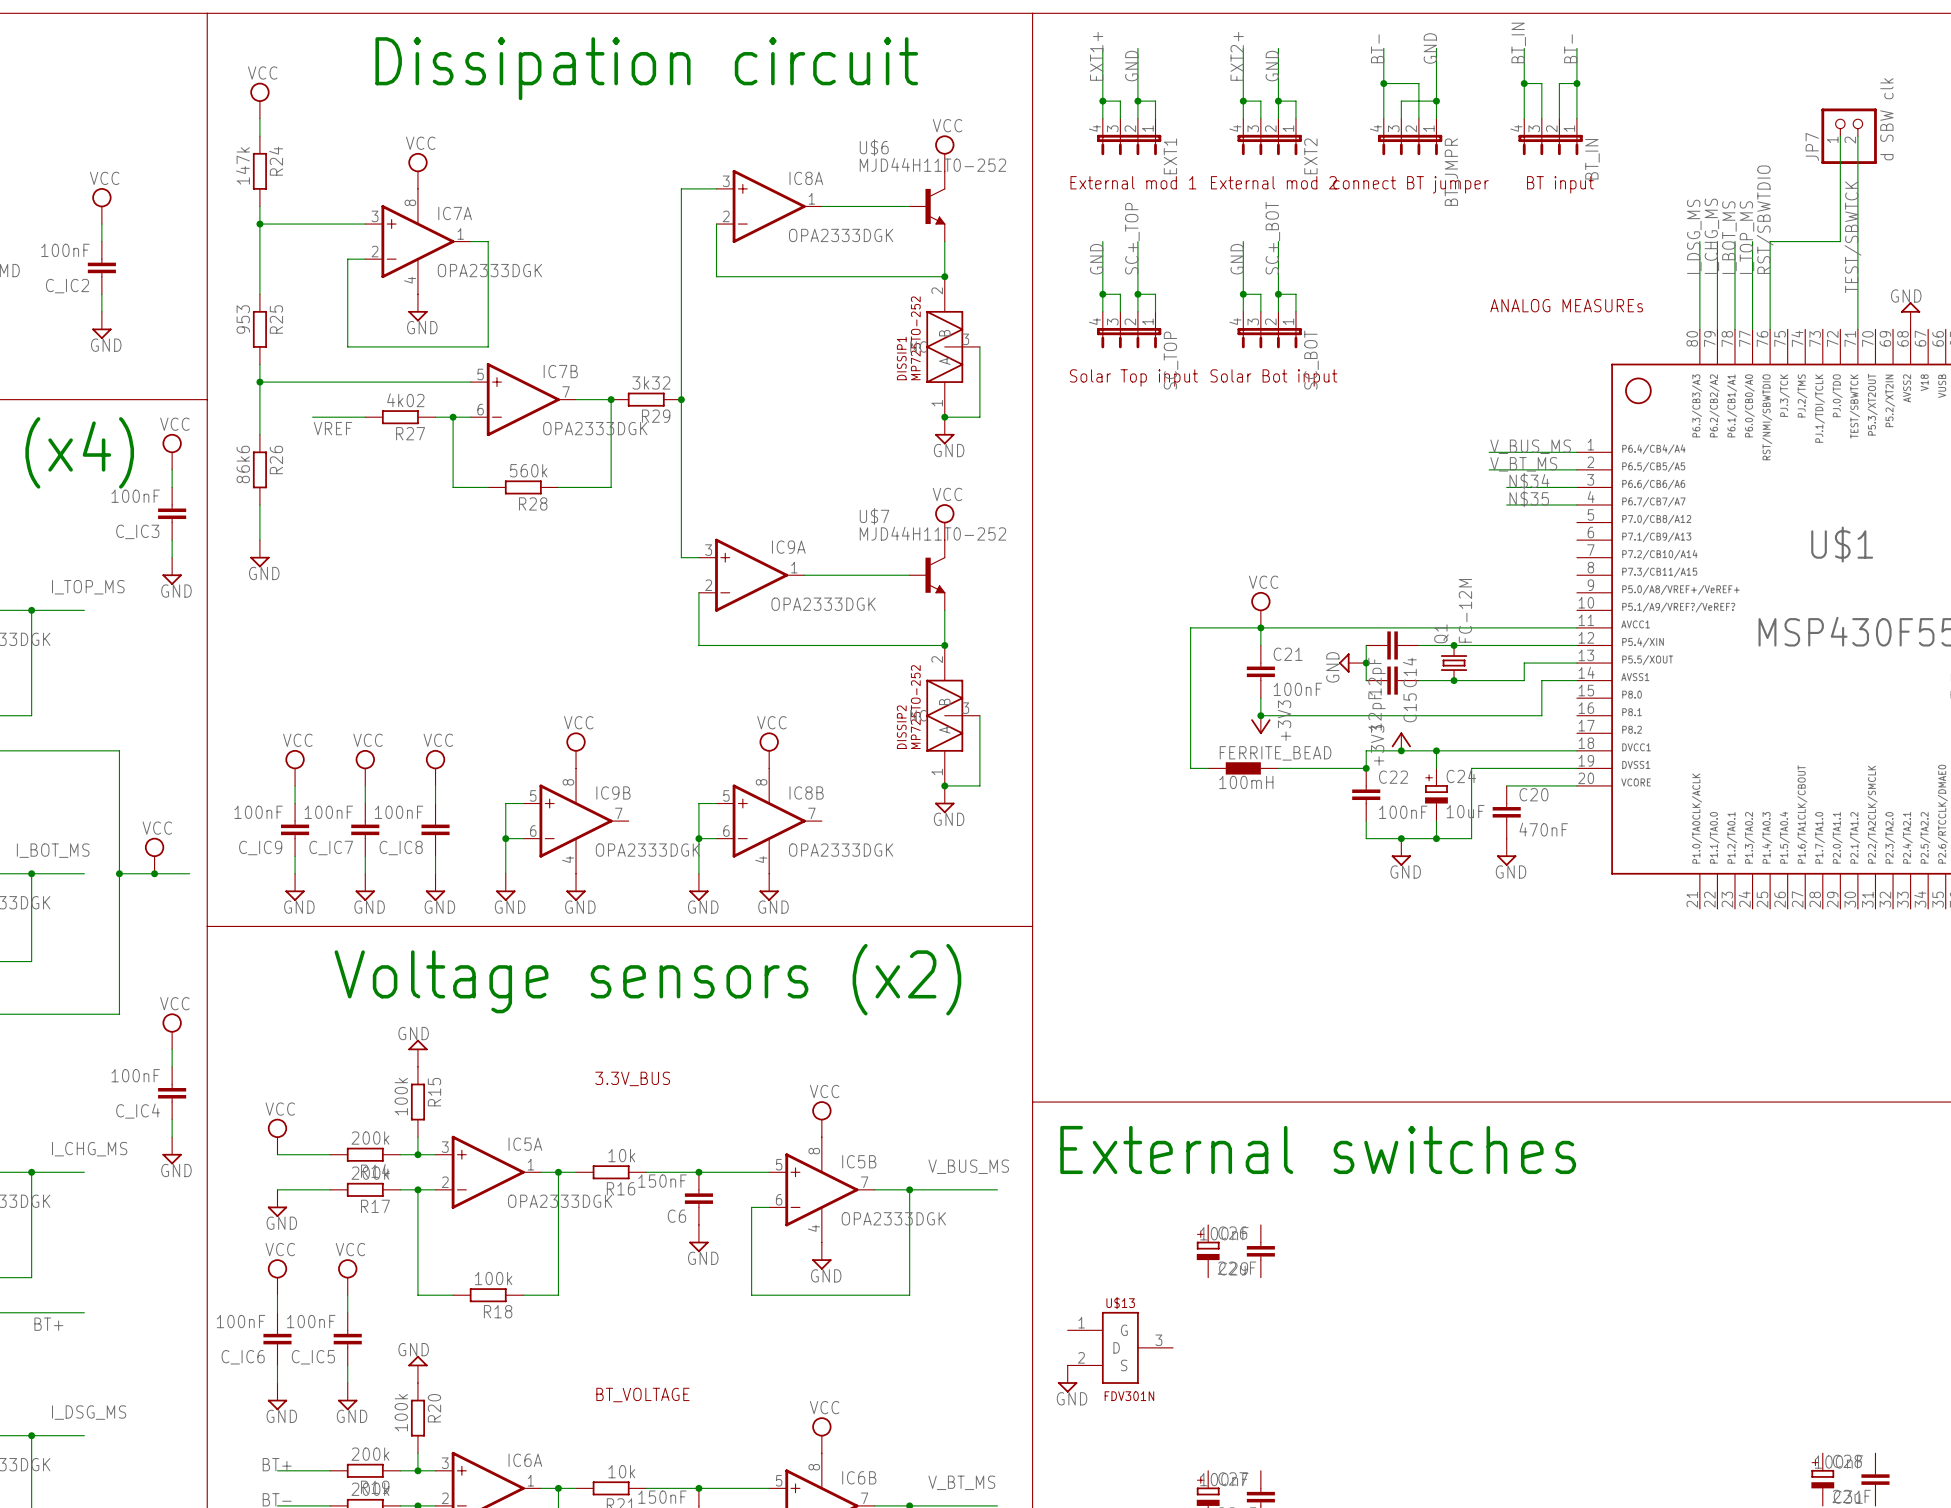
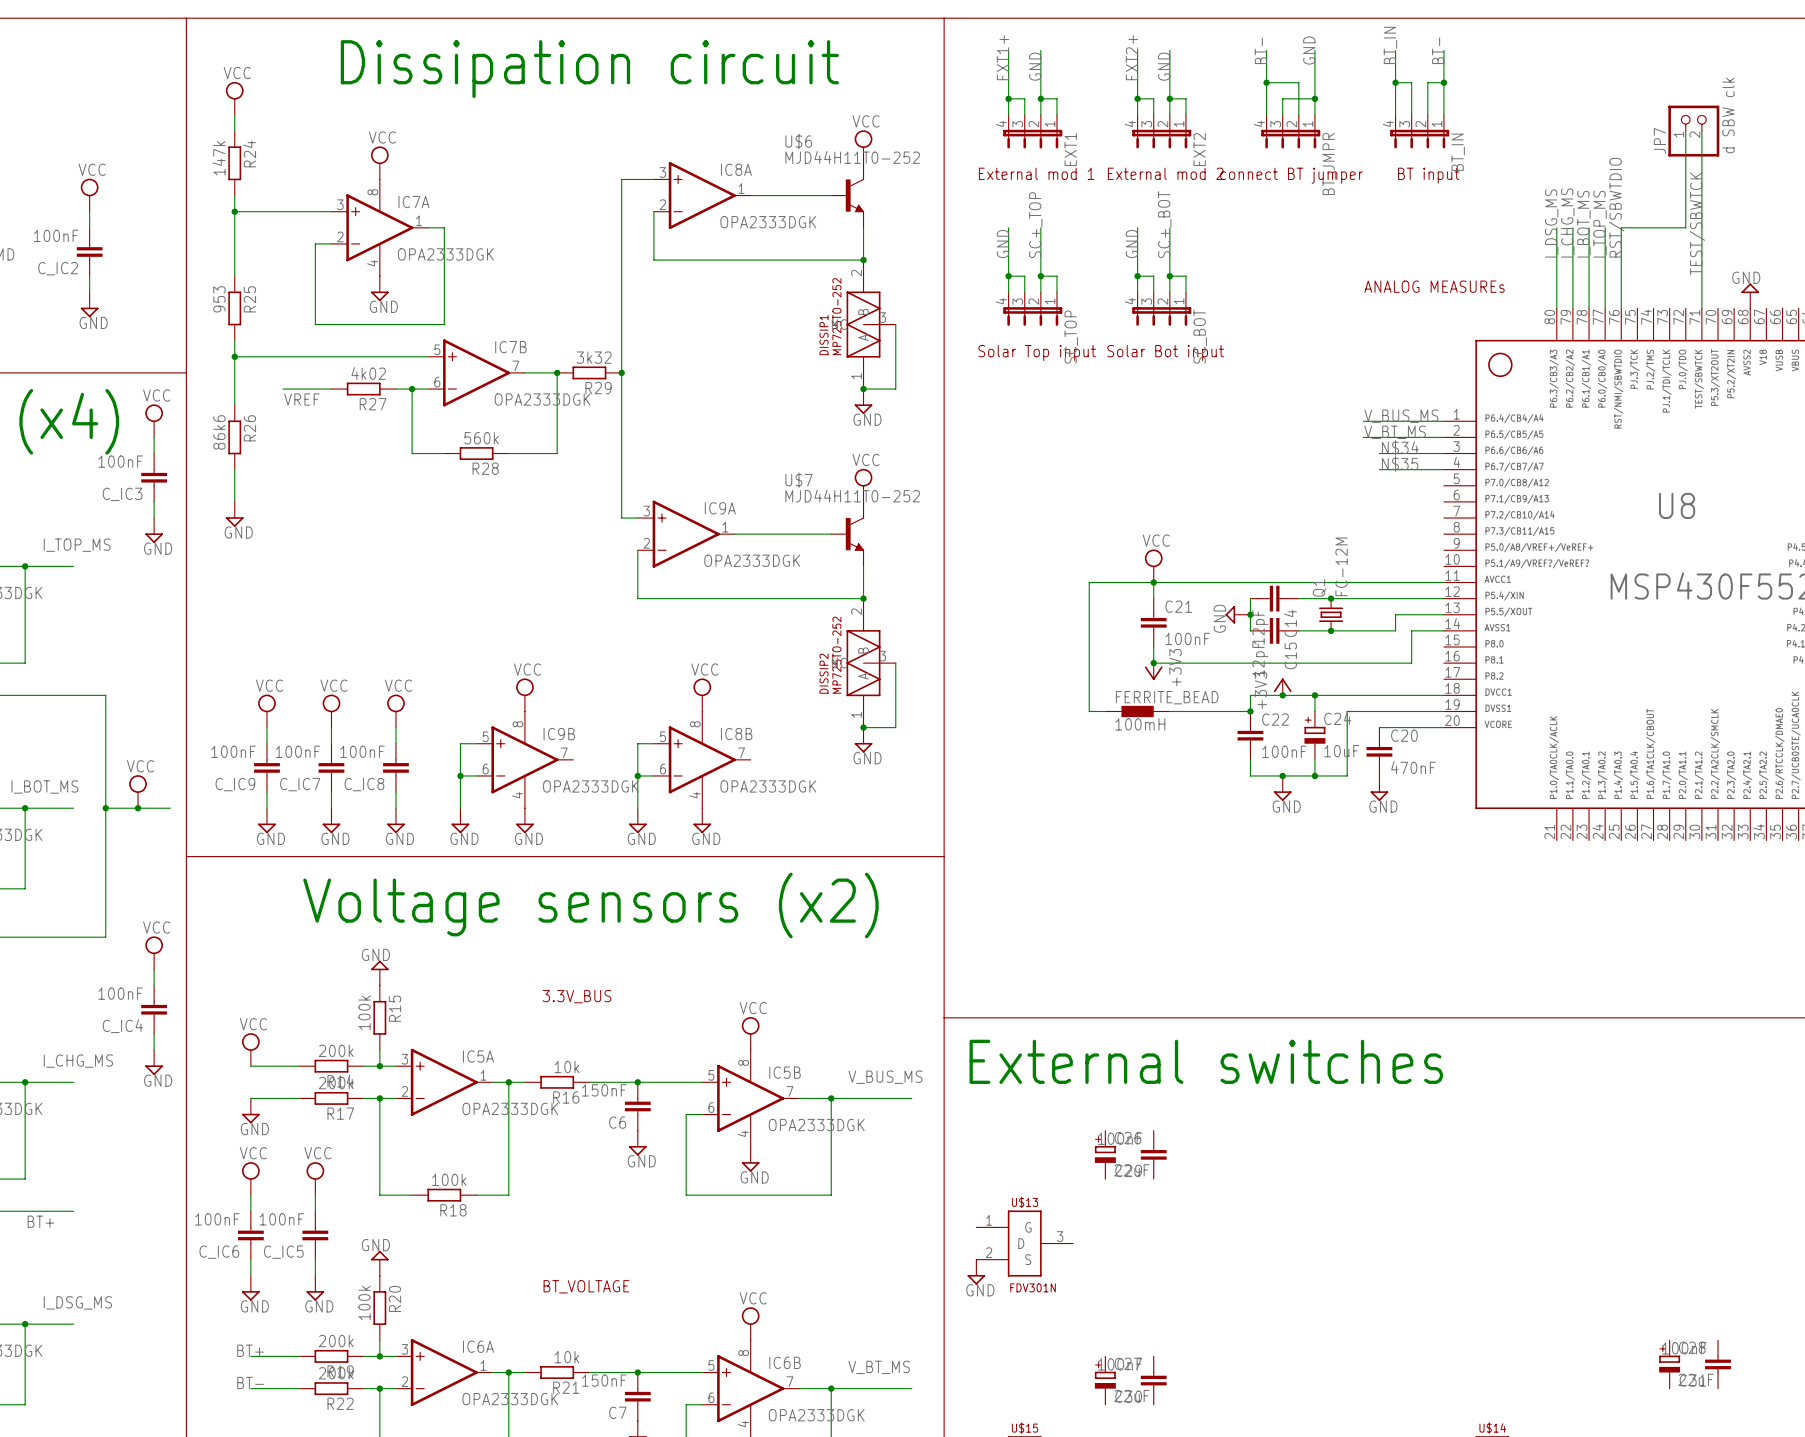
U$1 name: U$1 (1842, 544) -> U8 (1677, 505)

